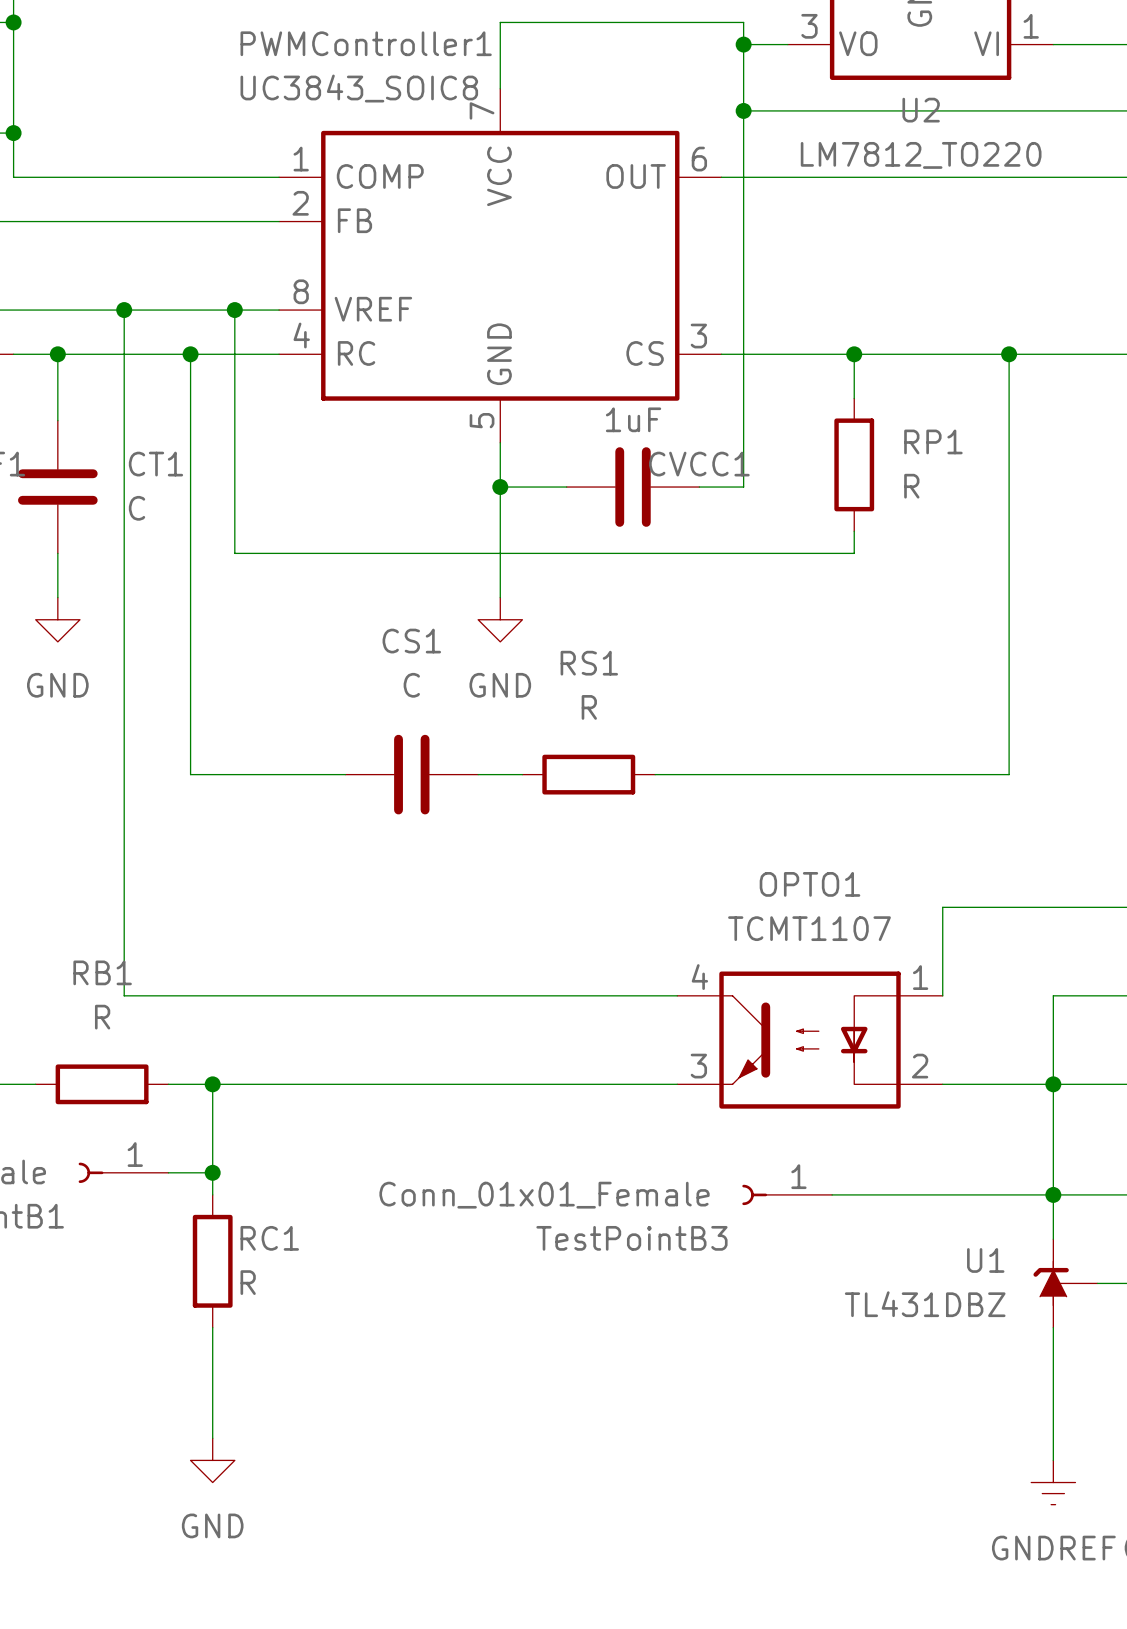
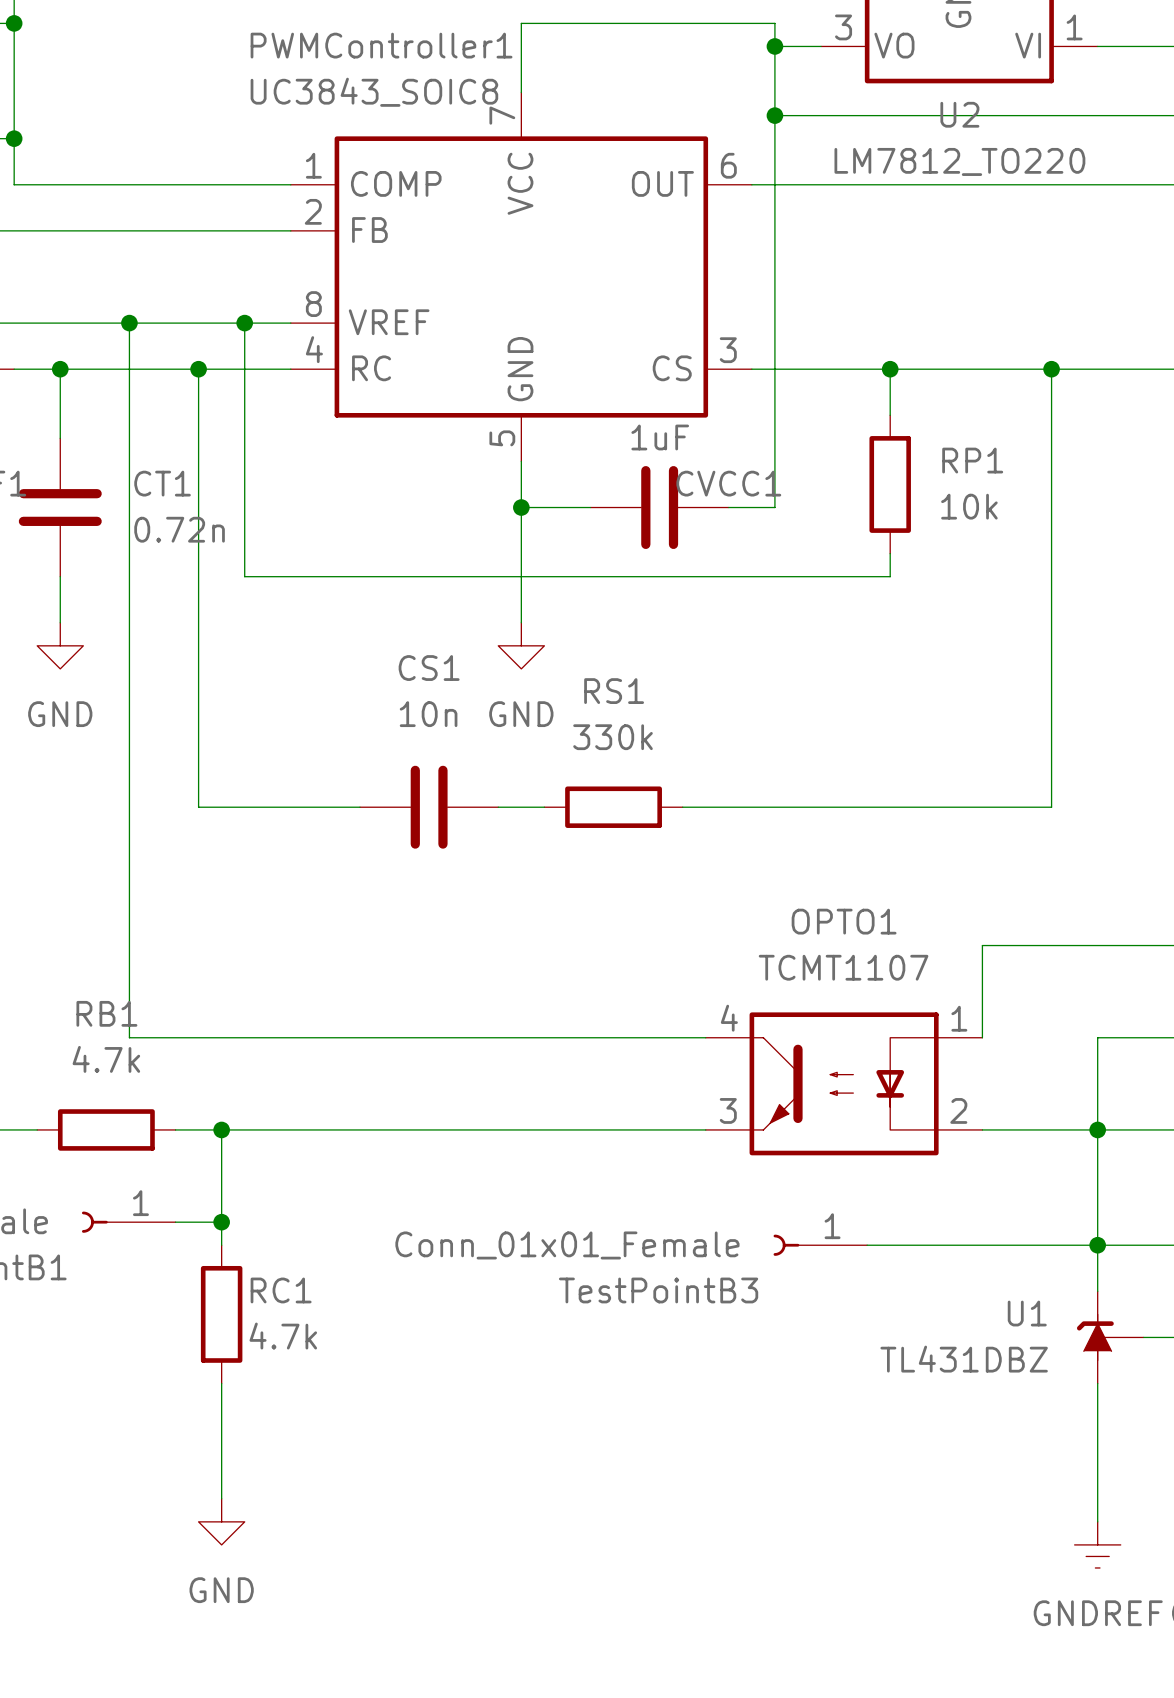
RP1 value: R (911, 486) -> 10k (969, 506)
CT1 value: C (137, 508) -> 0.72n (179, 529)
CS1 value: C (411, 685) -> 10n (428, 714)
RS1 value: R (589, 707) -> 330k (613, 737)
RB1 value: R (102, 1017) -> 4.7k (106, 1059)
RC1 value: R (248, 1282) -> 4.7k (283, 1336)

